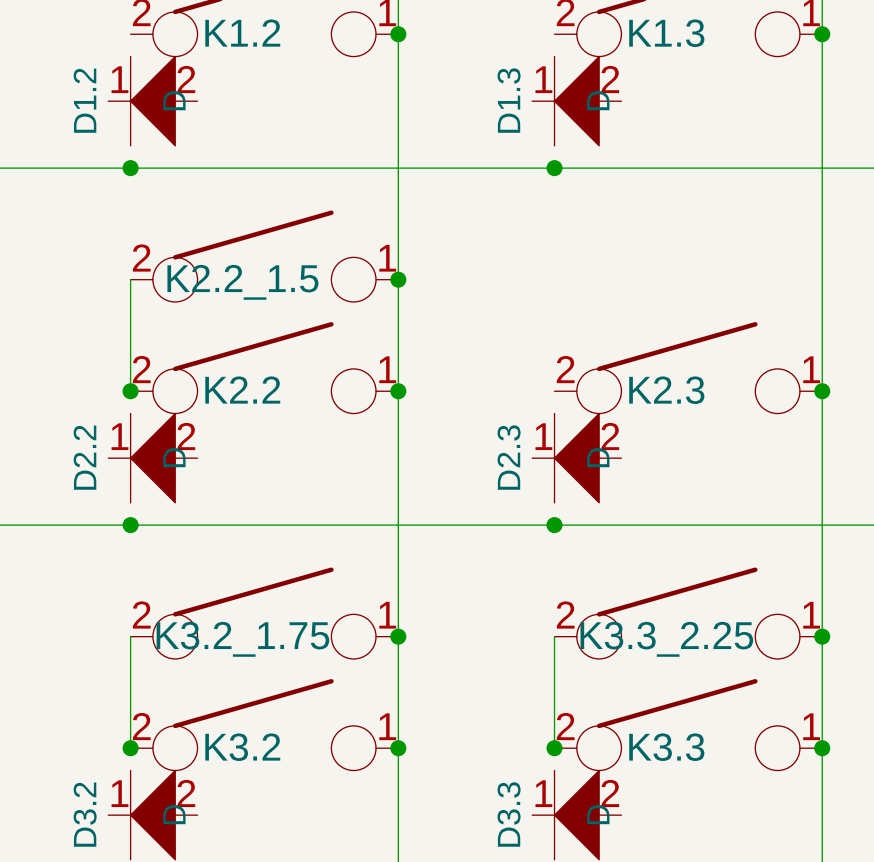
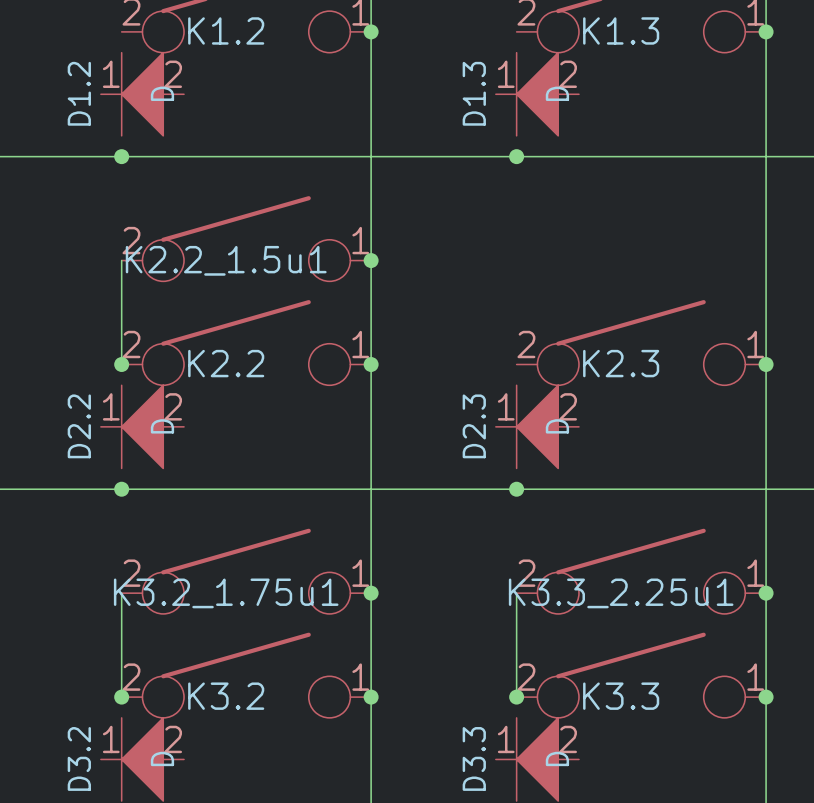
K2.2_1.5 name: K2.2_1.5 (242, 282) -> K2.2_1.5u1 (226, 260)
K3.2_1.75 name: K3.2_1.75 (242, 639) -> K3.2_1.75u1 (226, 593)
K3.3_2.25 name: K3.3_2.25 (666, 639) -> K3.3_2.25u1 (621, 593)

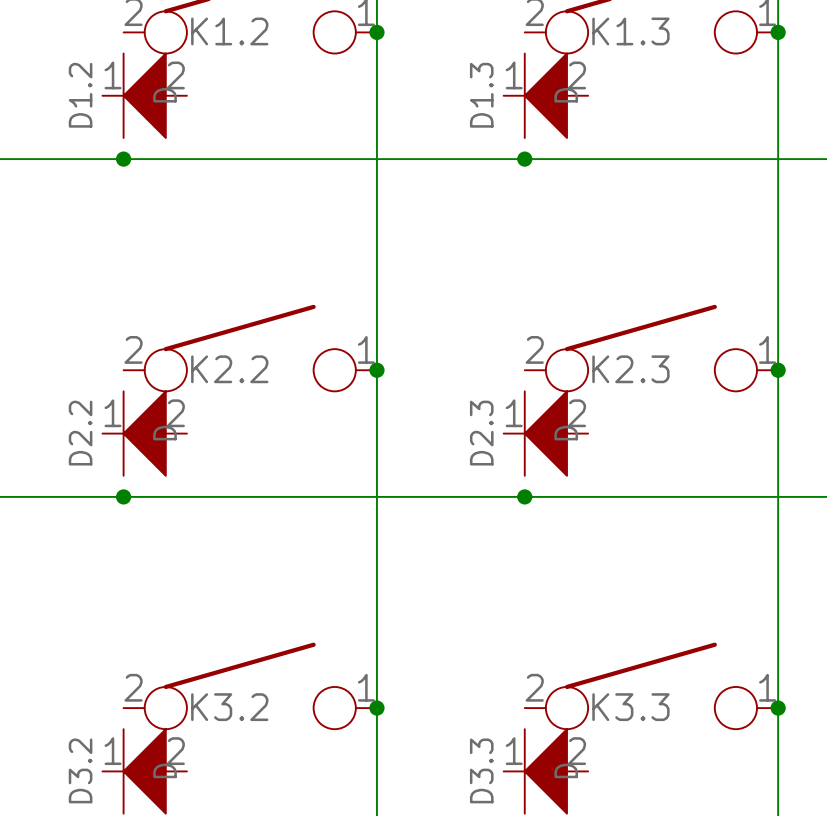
K2.2_1.5u1: (246, 238) -> none
wire: (121, 260) (121, 364) -> none
junction: (371, 260) -> none
junction: (121, 364) -> none
K3.2_1.75u1: (246, 571) -> none
K3.3_2.25u1: (641, 571) -> none
wire: (121, 593) (121, 697) -> none
junction: (371, 593) -> none
wire: (516, 593) (516, 697) -> none
junction: (766, 593) -> none
junction: (121, 697) -> none
junction: (516, 697) -> none

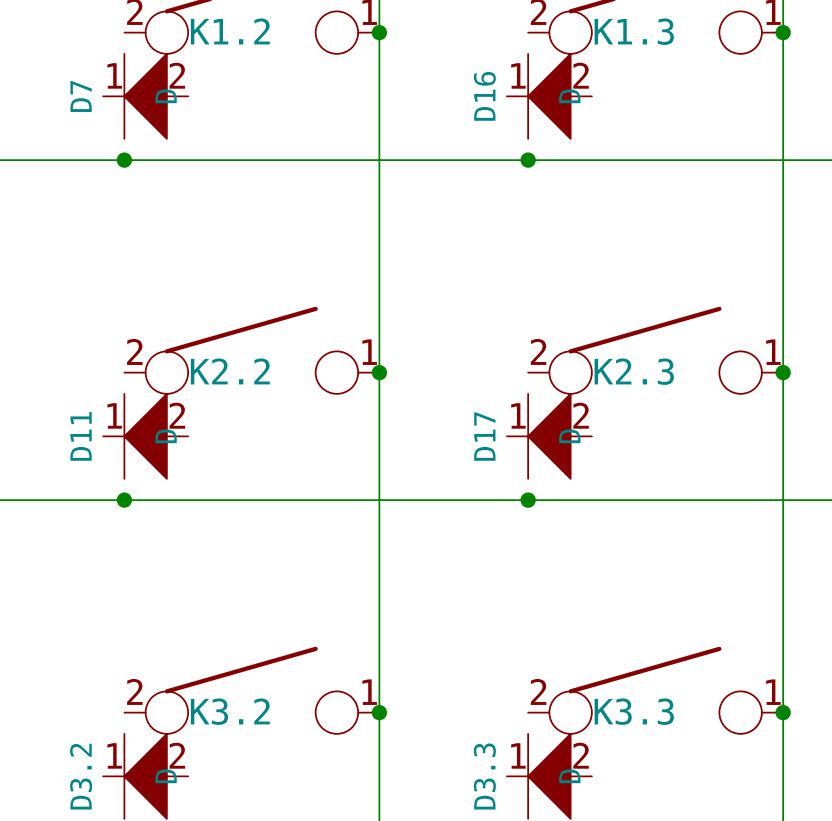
D1.2 name: D1.2 (80, 95) -> D7 (81, 96)
D1.3 name: D1.3 (481, 95) -> D16 (484, 96)
D2.2 name: D2.2 (80, 433) -> D11 (81, 436)
D2.3 name: D2.3 (481, 433) -> D17 (484, 436)

